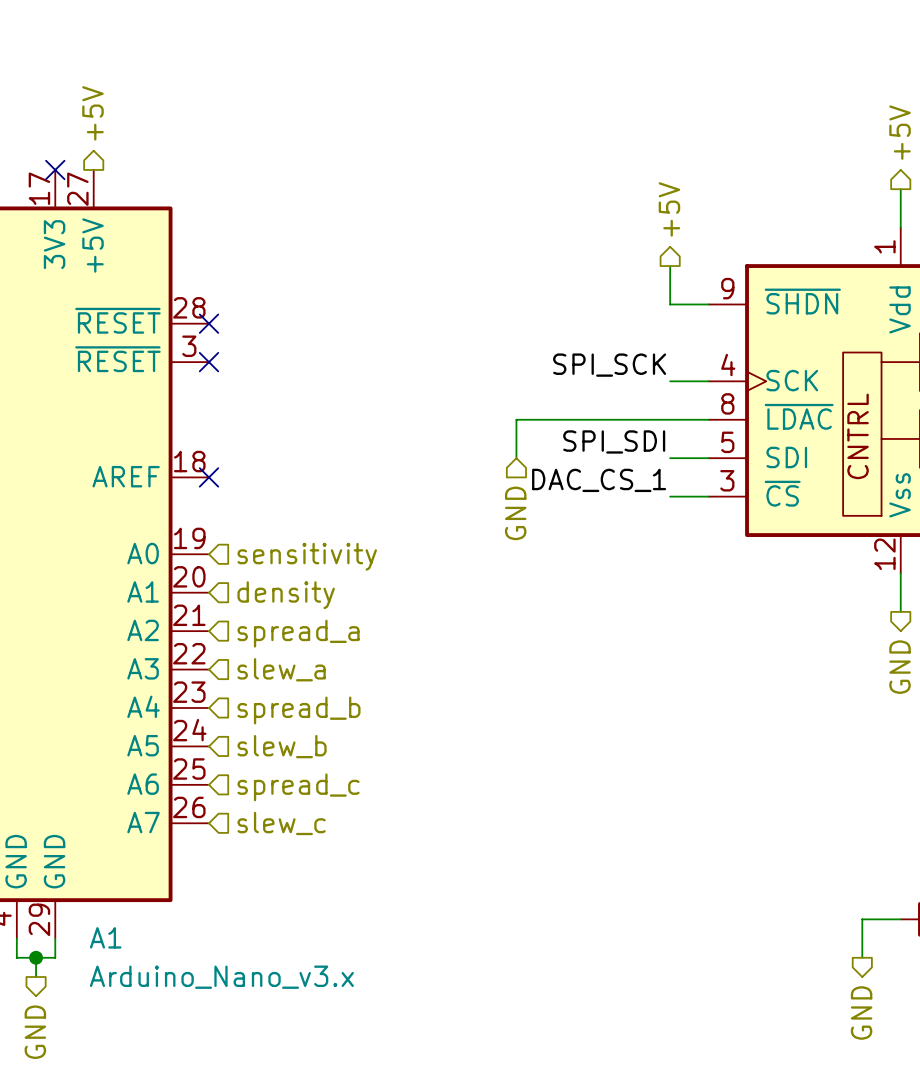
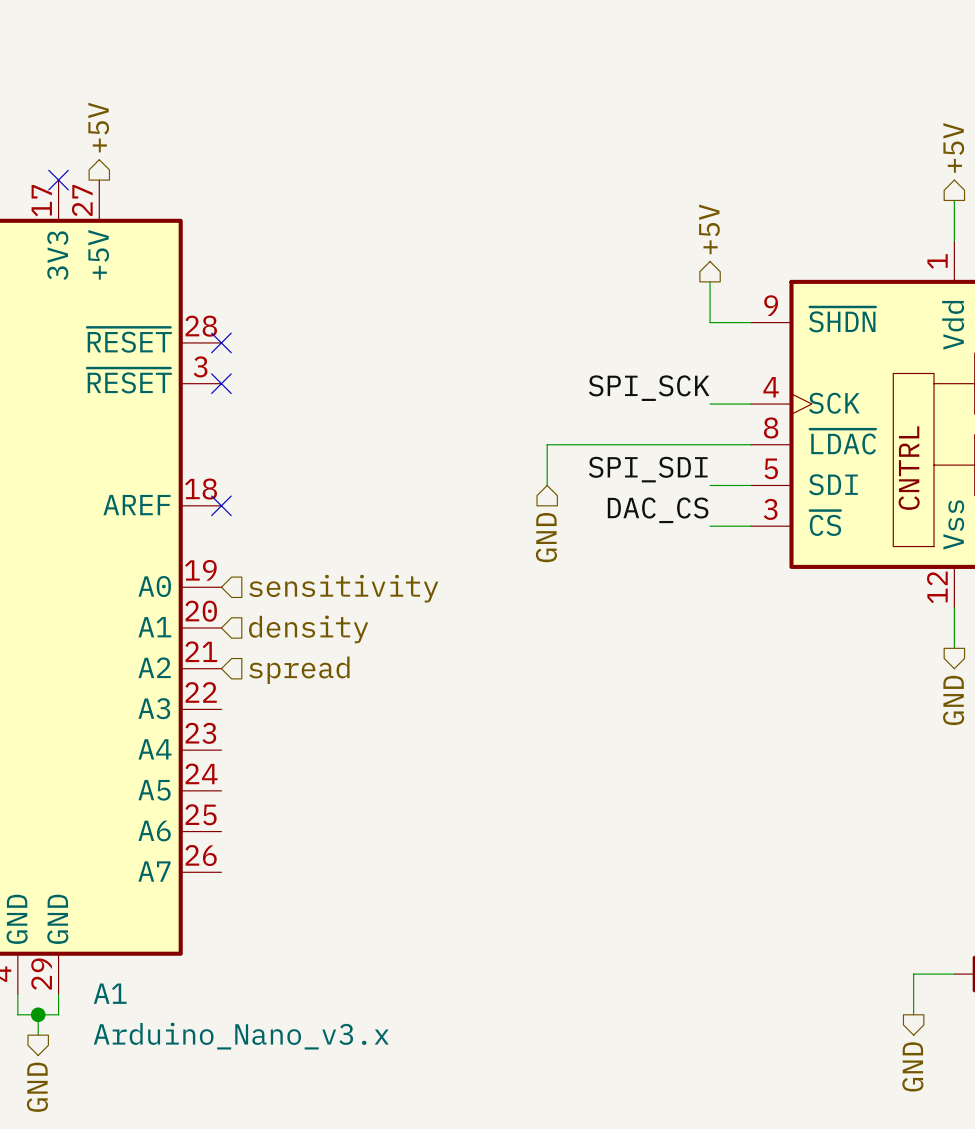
label: DAC_CS_1 (599, 480) -> DAC_CS (658, 510)
hierarchical label: spread_a (298, 633) -> spread (299, 670)
hierarchical label: slew_a (281, 669) -> none
hierarchical label: spread_b (298, 710) -> none
hierarchical label: slew_b (282, 746) -> none
hierarchical label: spread_c (298, 787) -> none
hierarchical label: slew_c (281, 823) -> none

